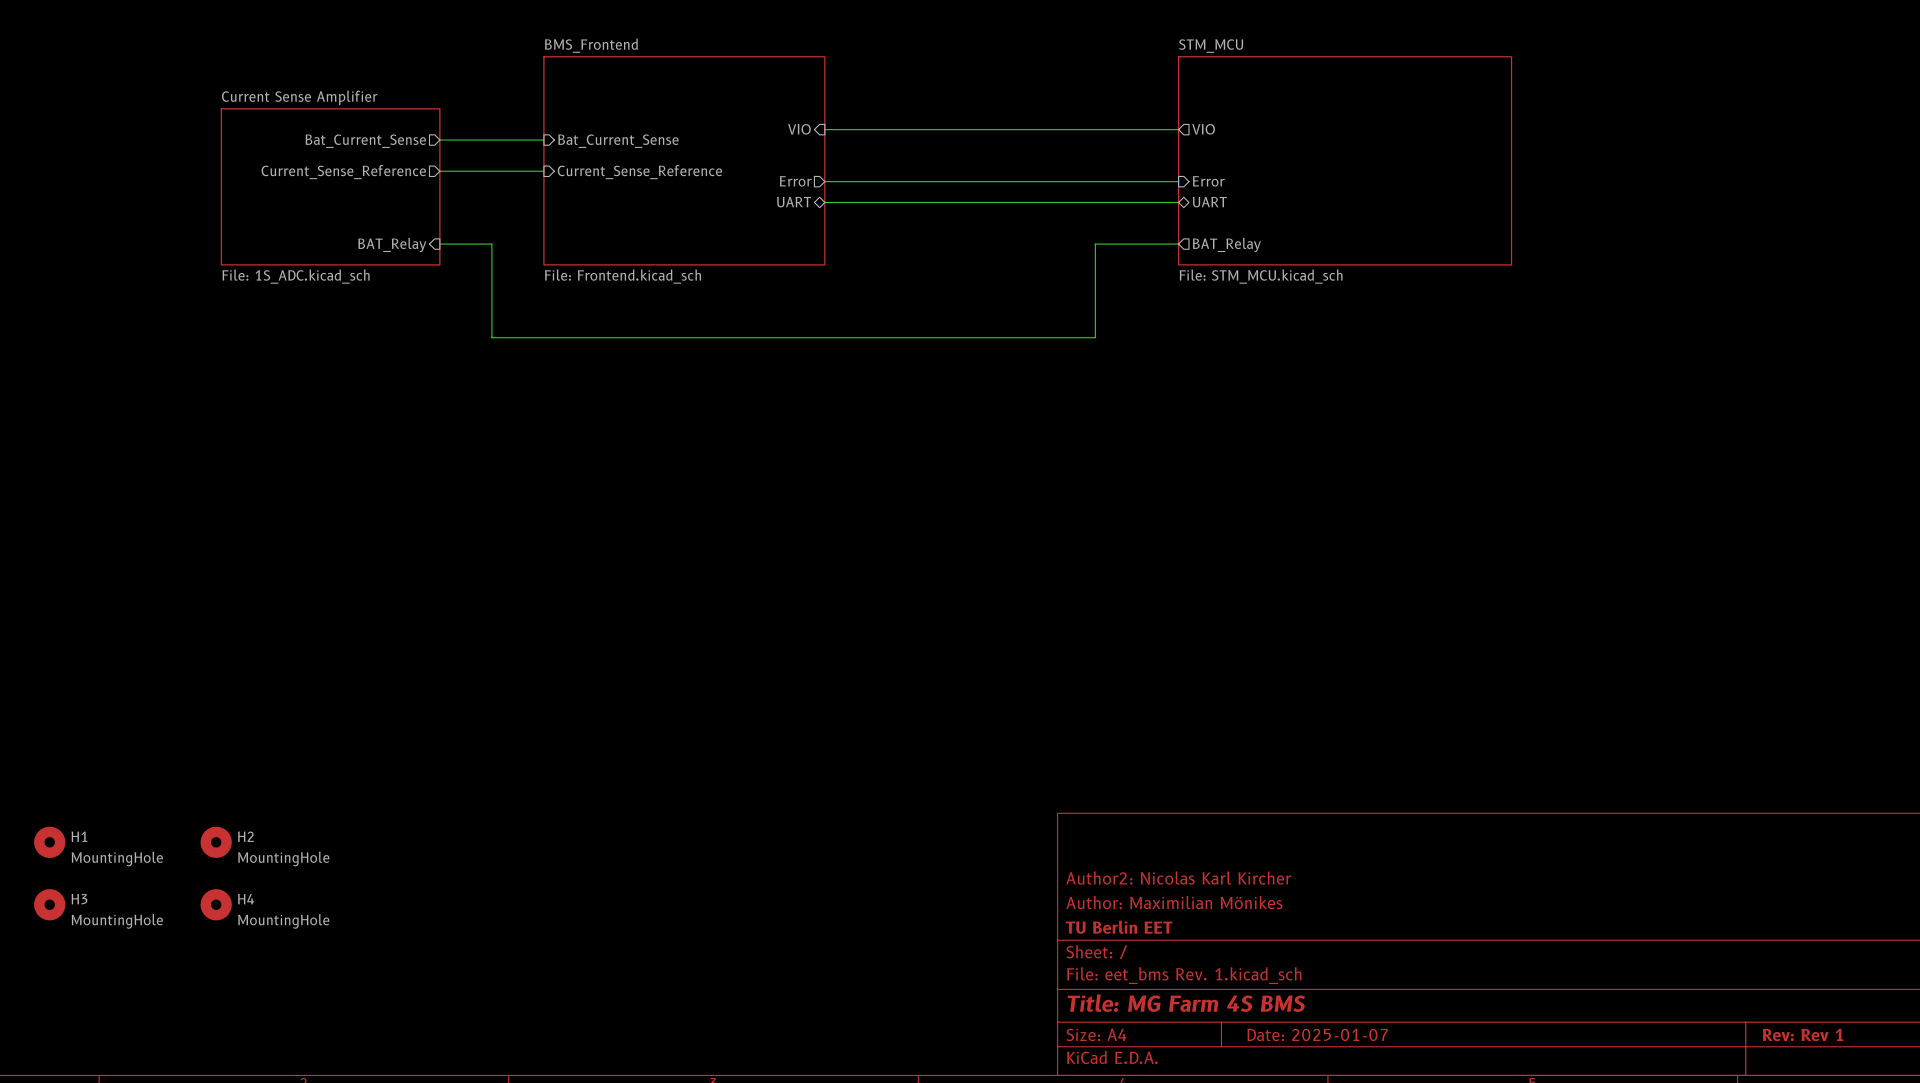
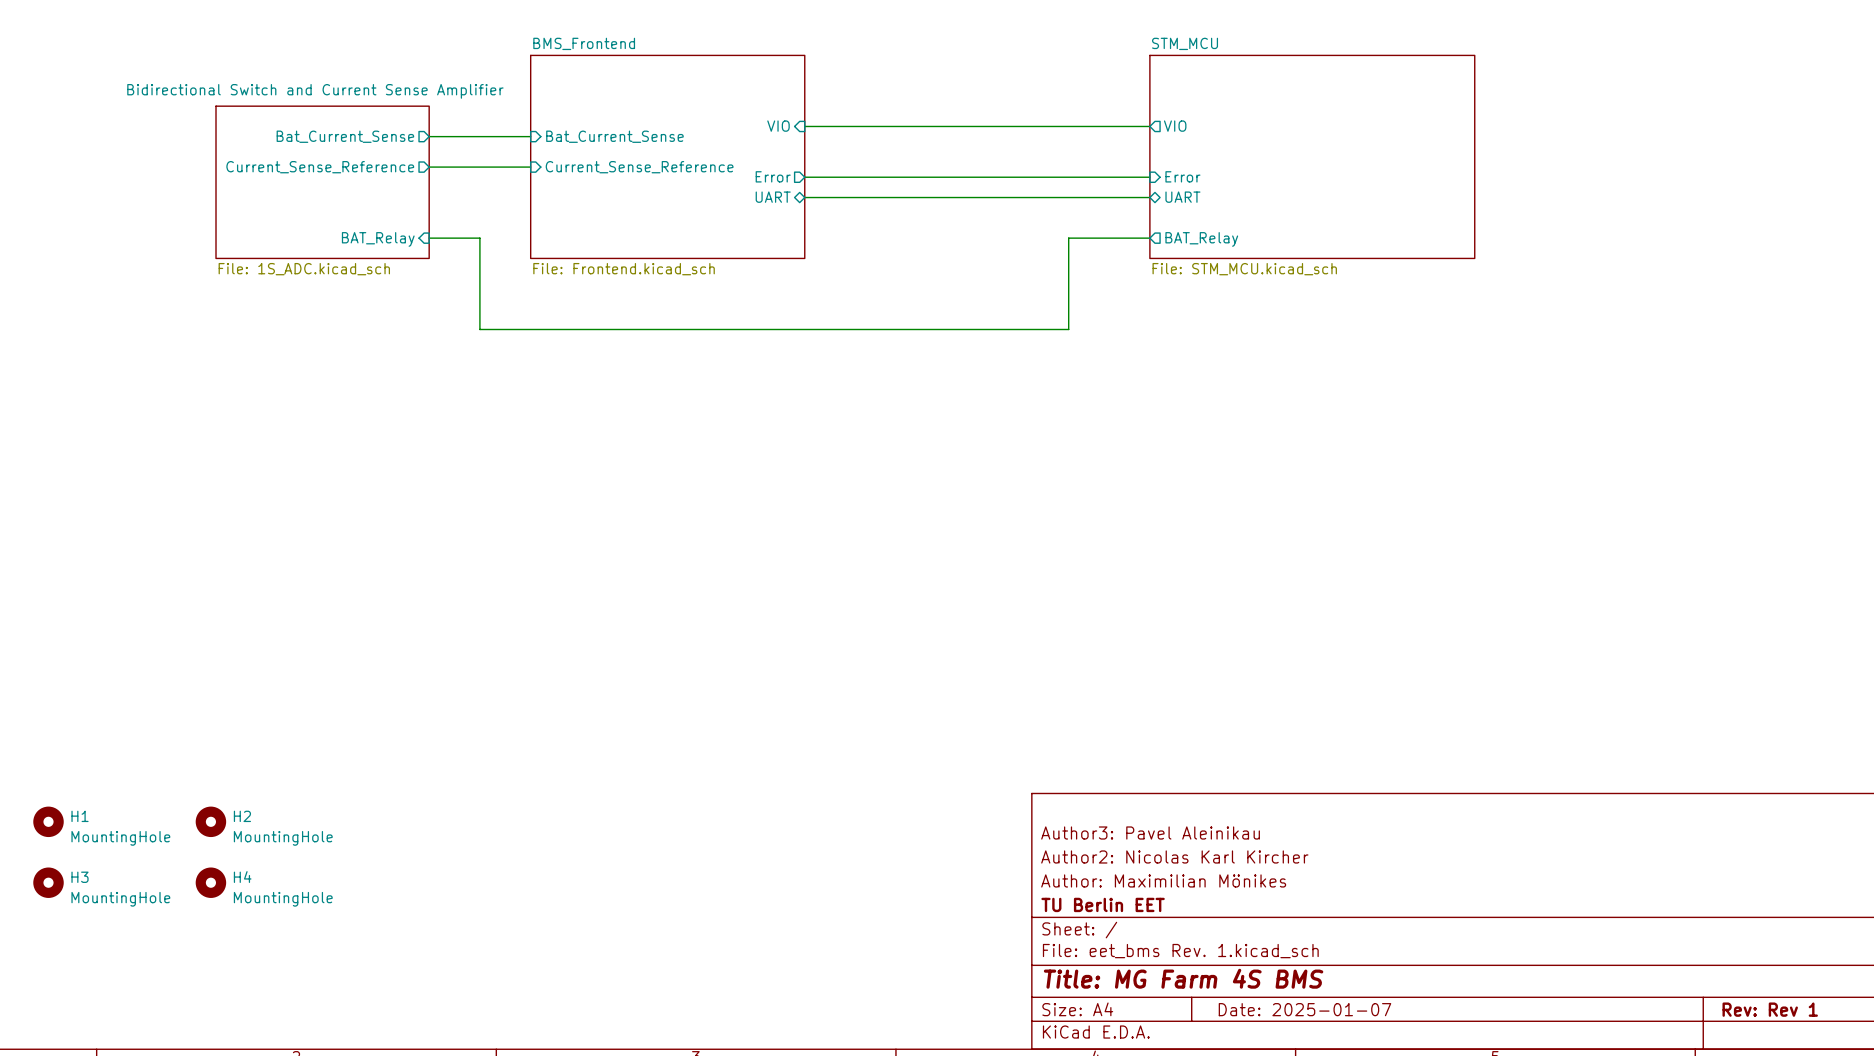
sheet Current Sense Amplifier name: Current Sense Amplifier (299, 97) -> Bidirectional Switch and Current Sense Amplifier (315, 91)
title block: none -> Author3: Pavel Aleinikau (1150, 833)

